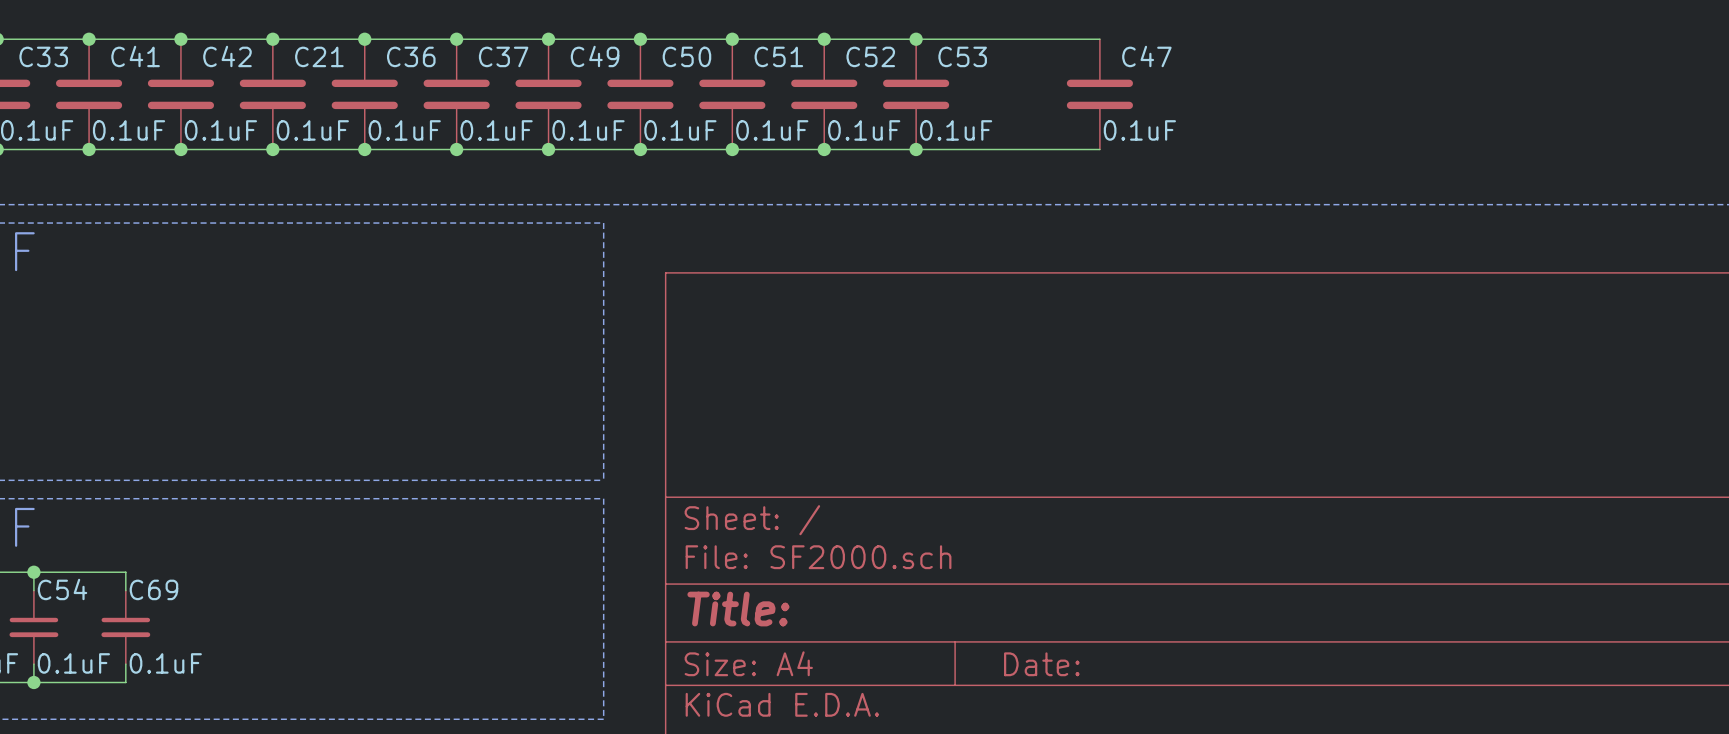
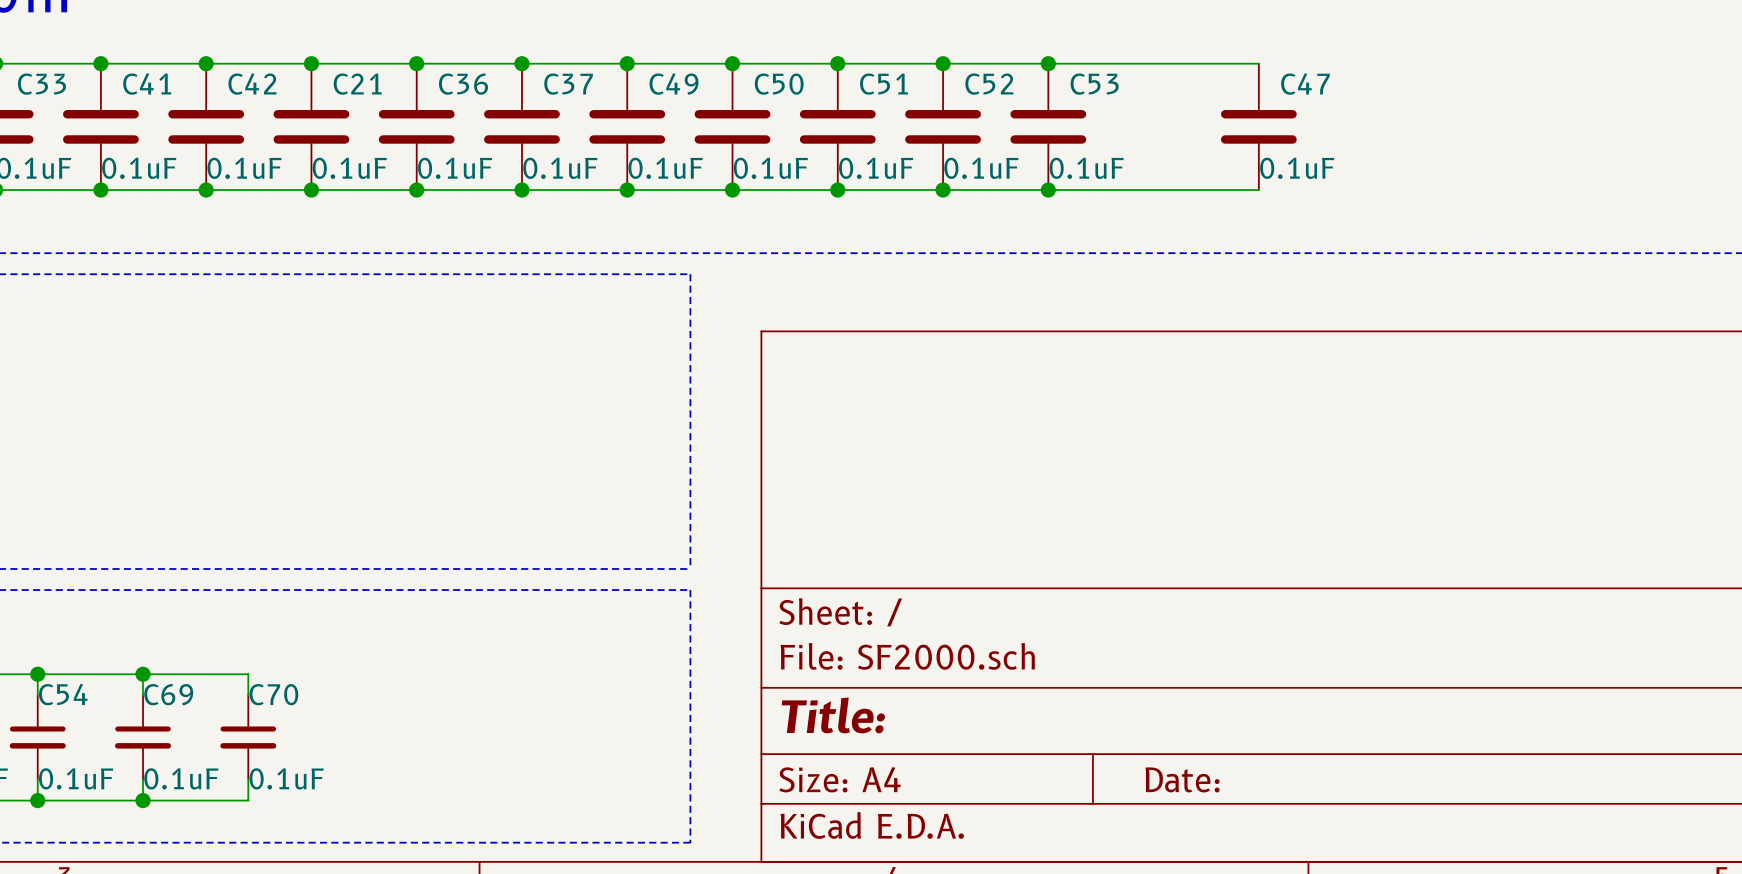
wire: none -> (143, 674) (248, 674) (248, 695)
junction: none -> (143, 674)
C70: none -> 0.1uF (248, 737)
wire: none -> (248, 779) (248, 800) (143, 800)
junction: none -> (143, 800)

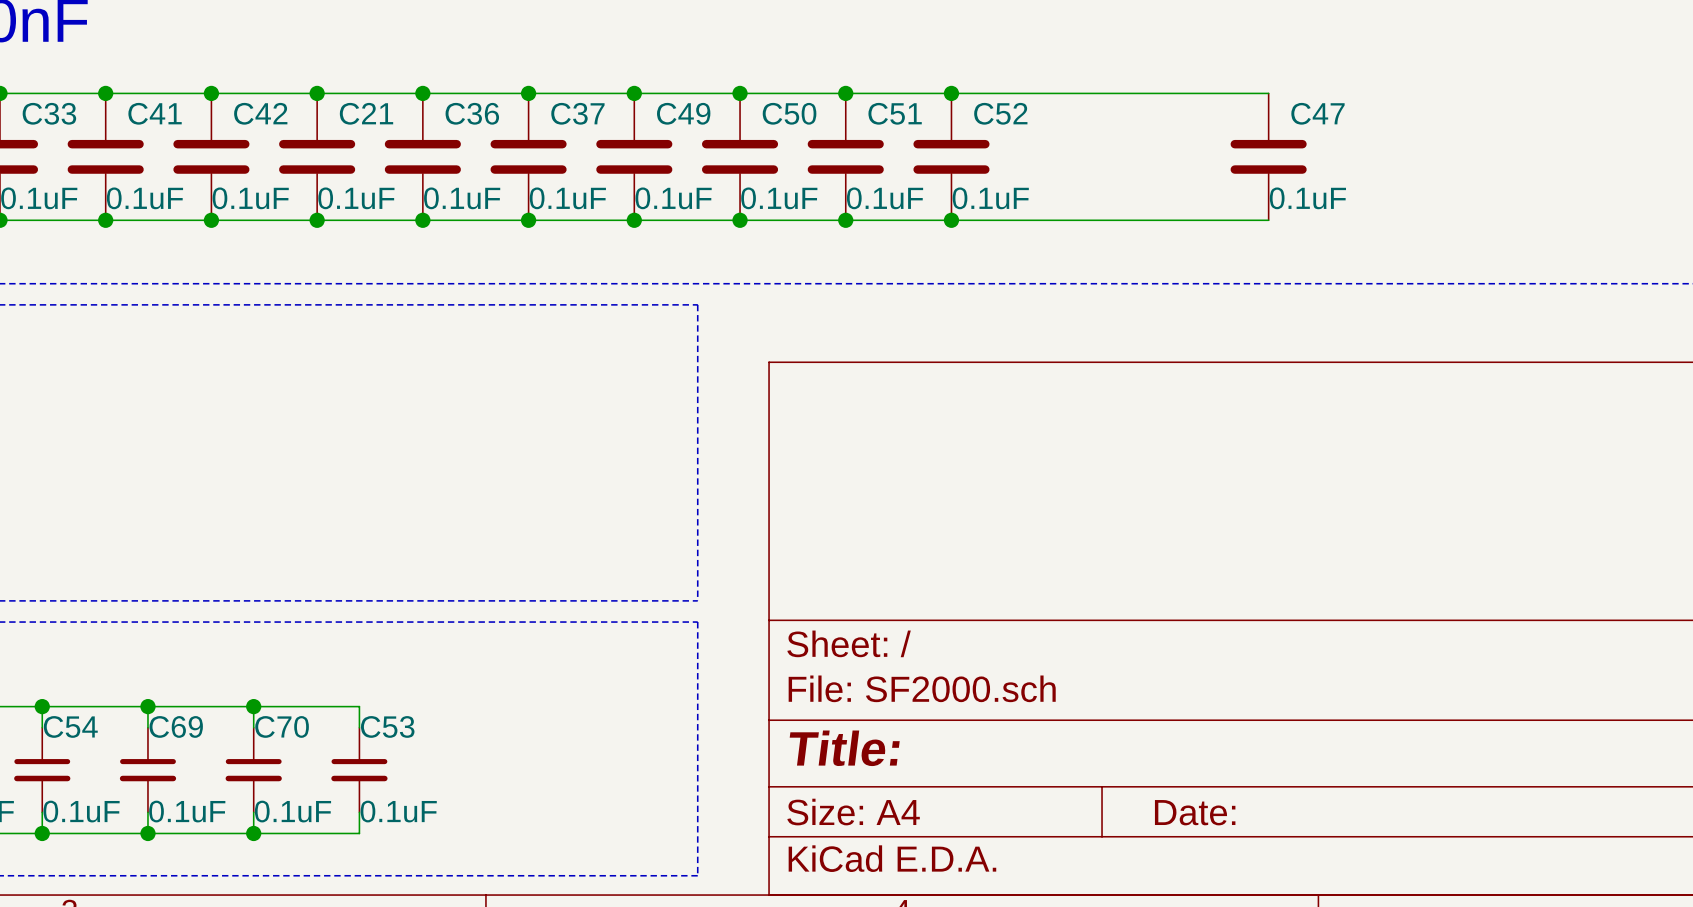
C53 symbol: [1010, 63, 1087, 191] -> [331, 727, 388, 813]
junction: (1048, 63) -> none
junction: (1048, 190) -> none
wire: none -> (253, 706) (359, 706) (359, 727)
junction: none -> (253, 706)
wire: none -> (359, 812) (359, 833) (253, 833)
junction: none -> (253, 833)

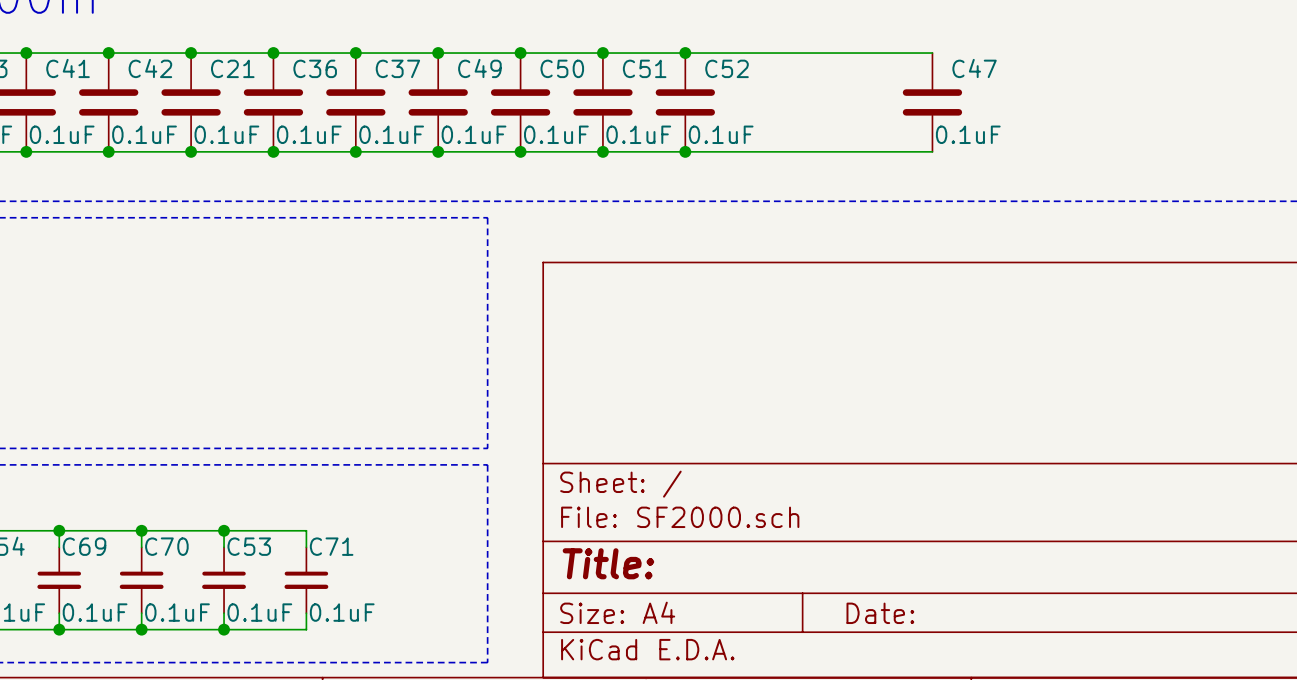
wire: none -> (224, 530) (306, 530) (306, 547)
junction: none -> (224, 530)
C71: none -> 0.1uF (306, 580)
wire: none -> (306, 613) (306, 629) (224, 629)
junction: none -> (224, 629)

